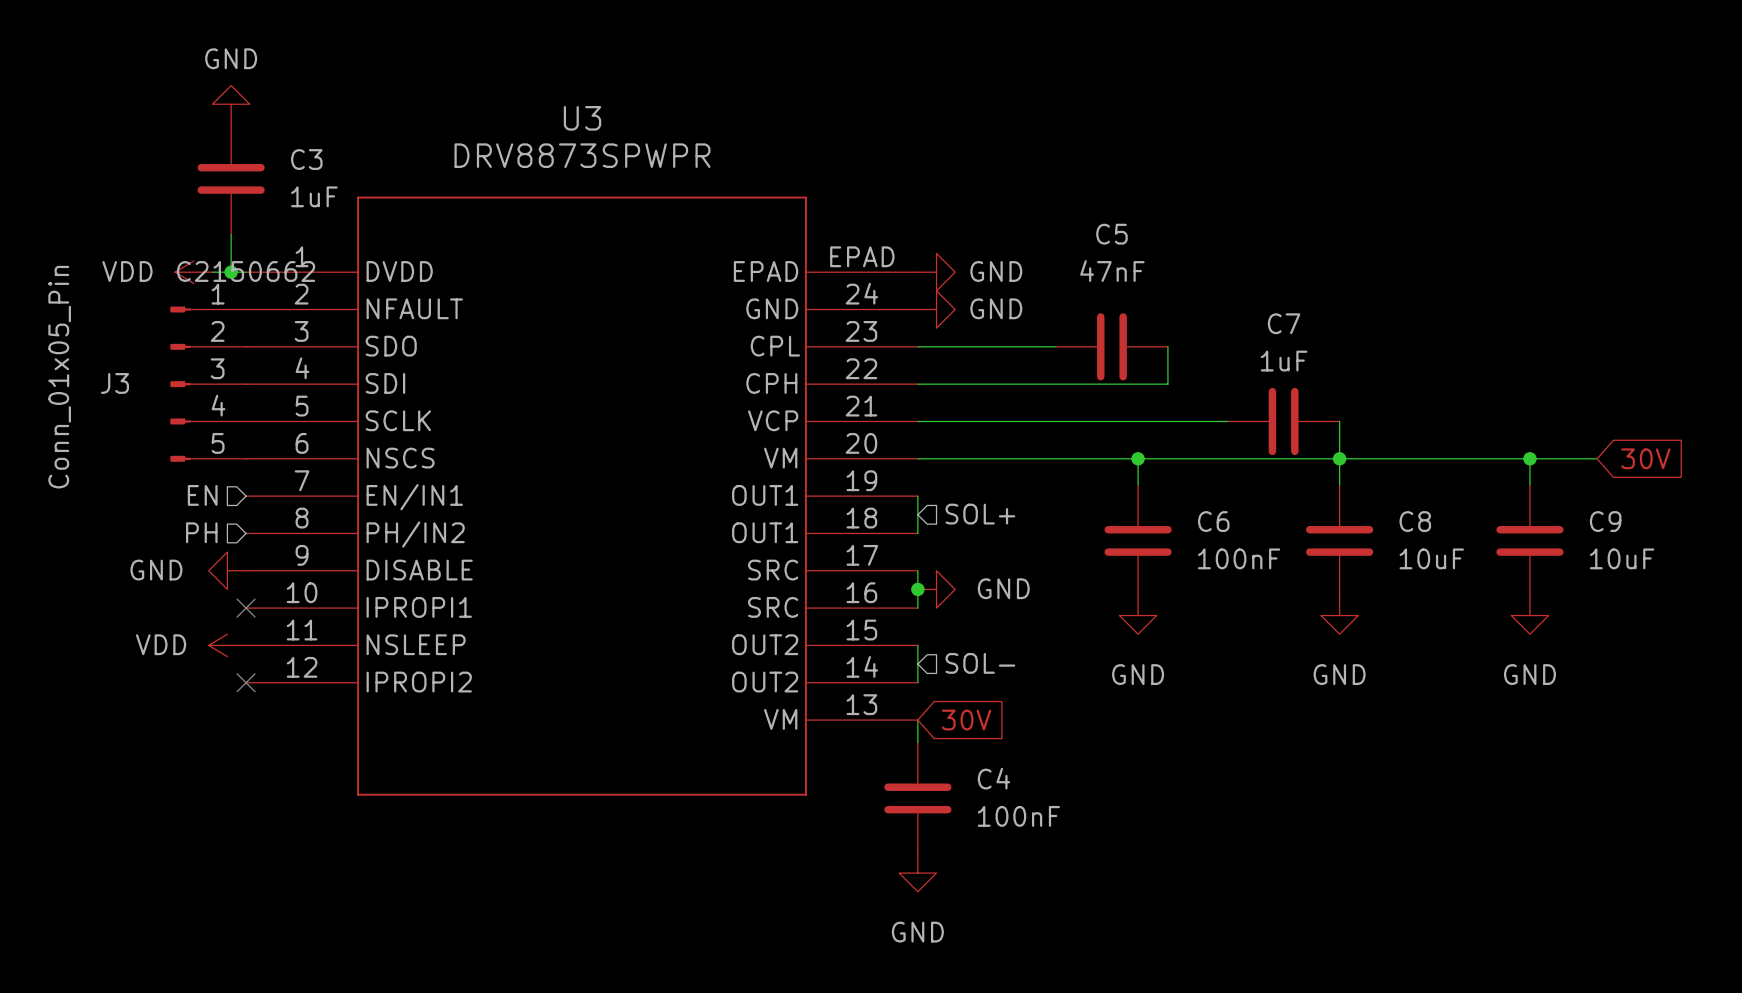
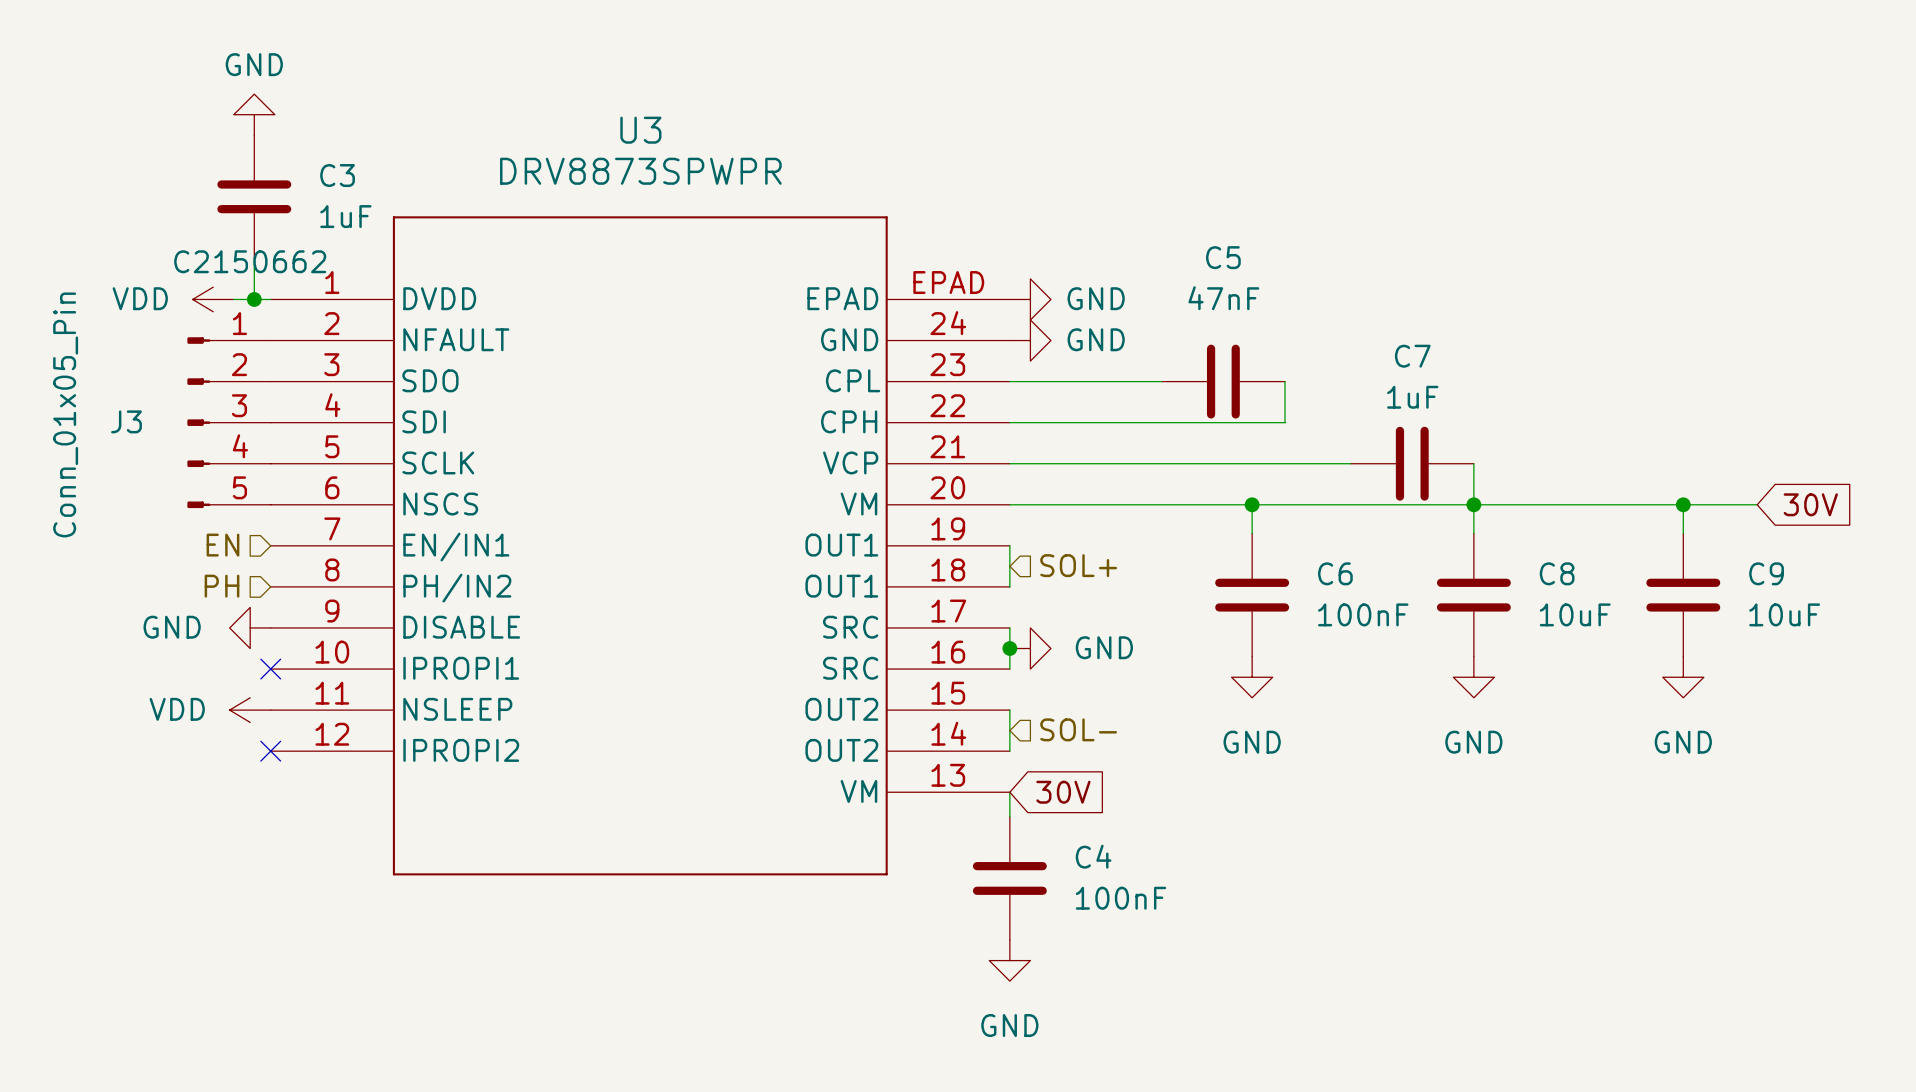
U3 text position: C2150662 (246, 271) -> C2150662 (250, 261)

